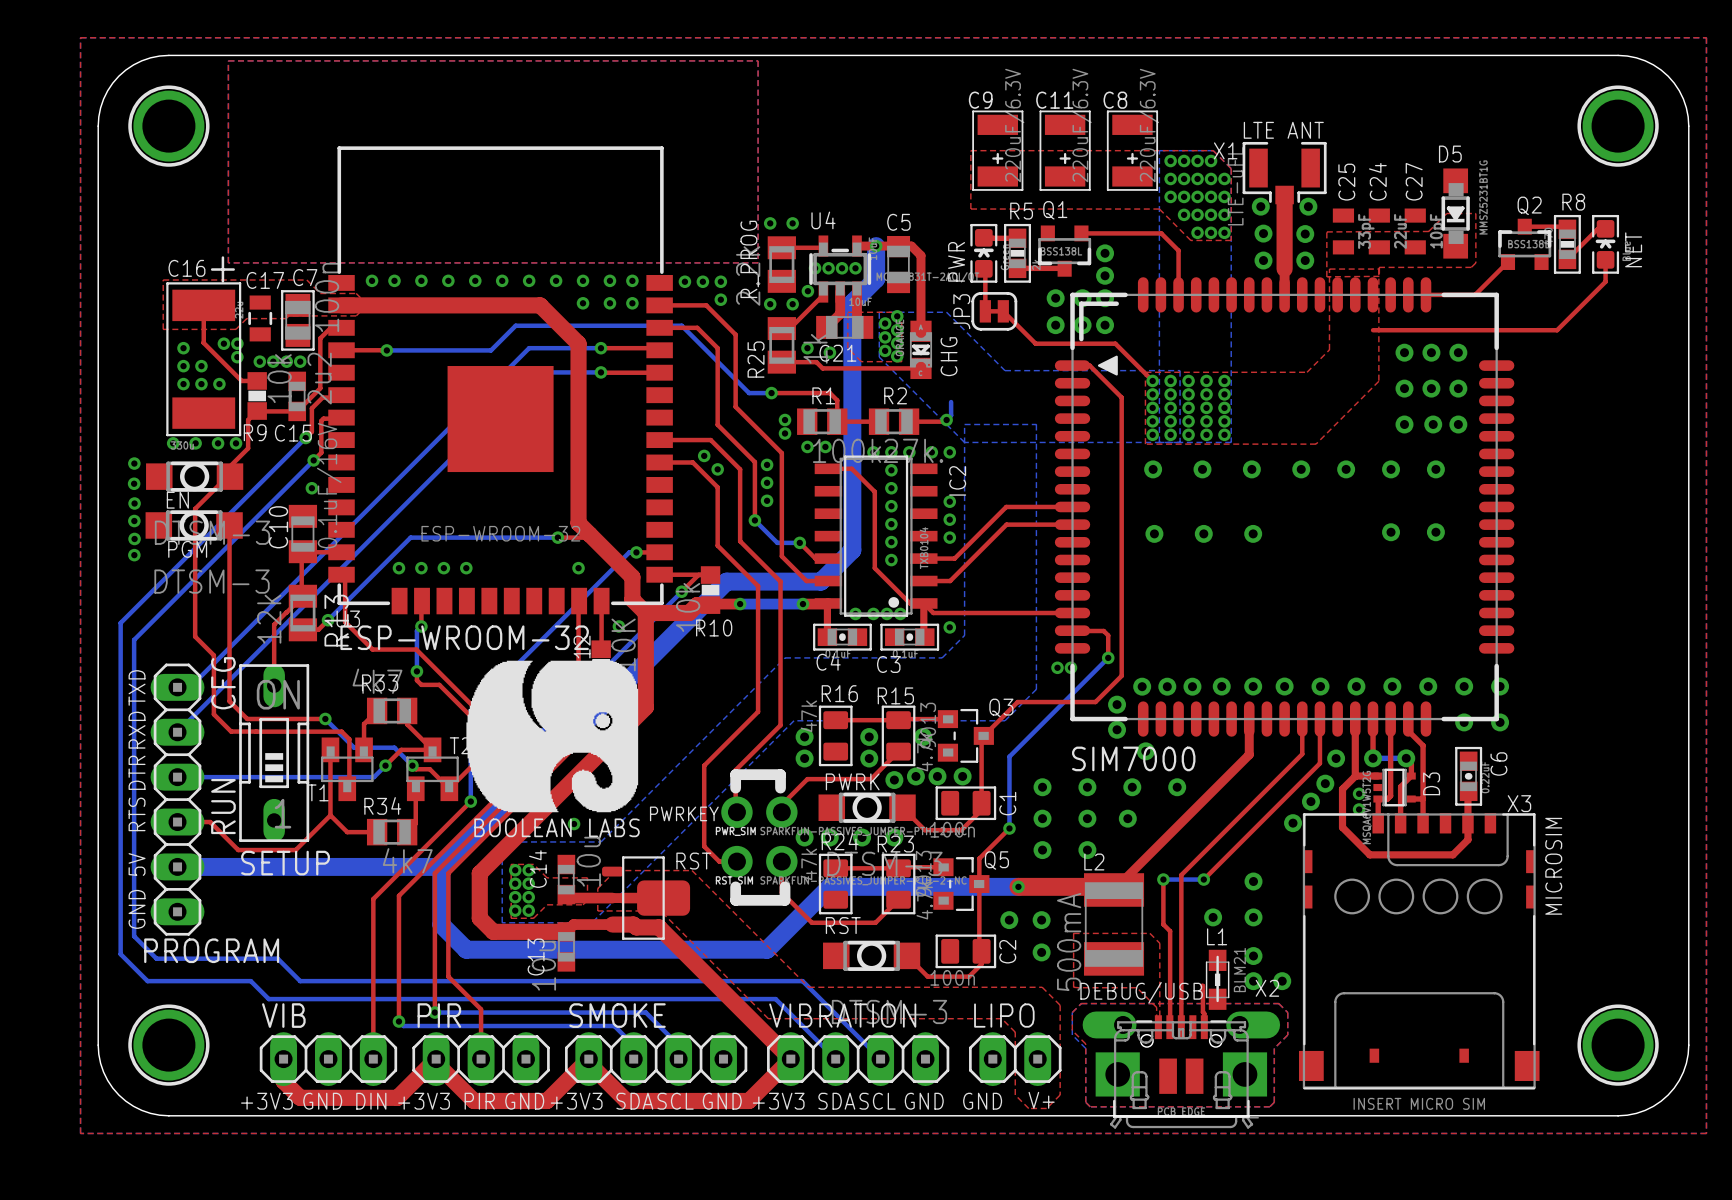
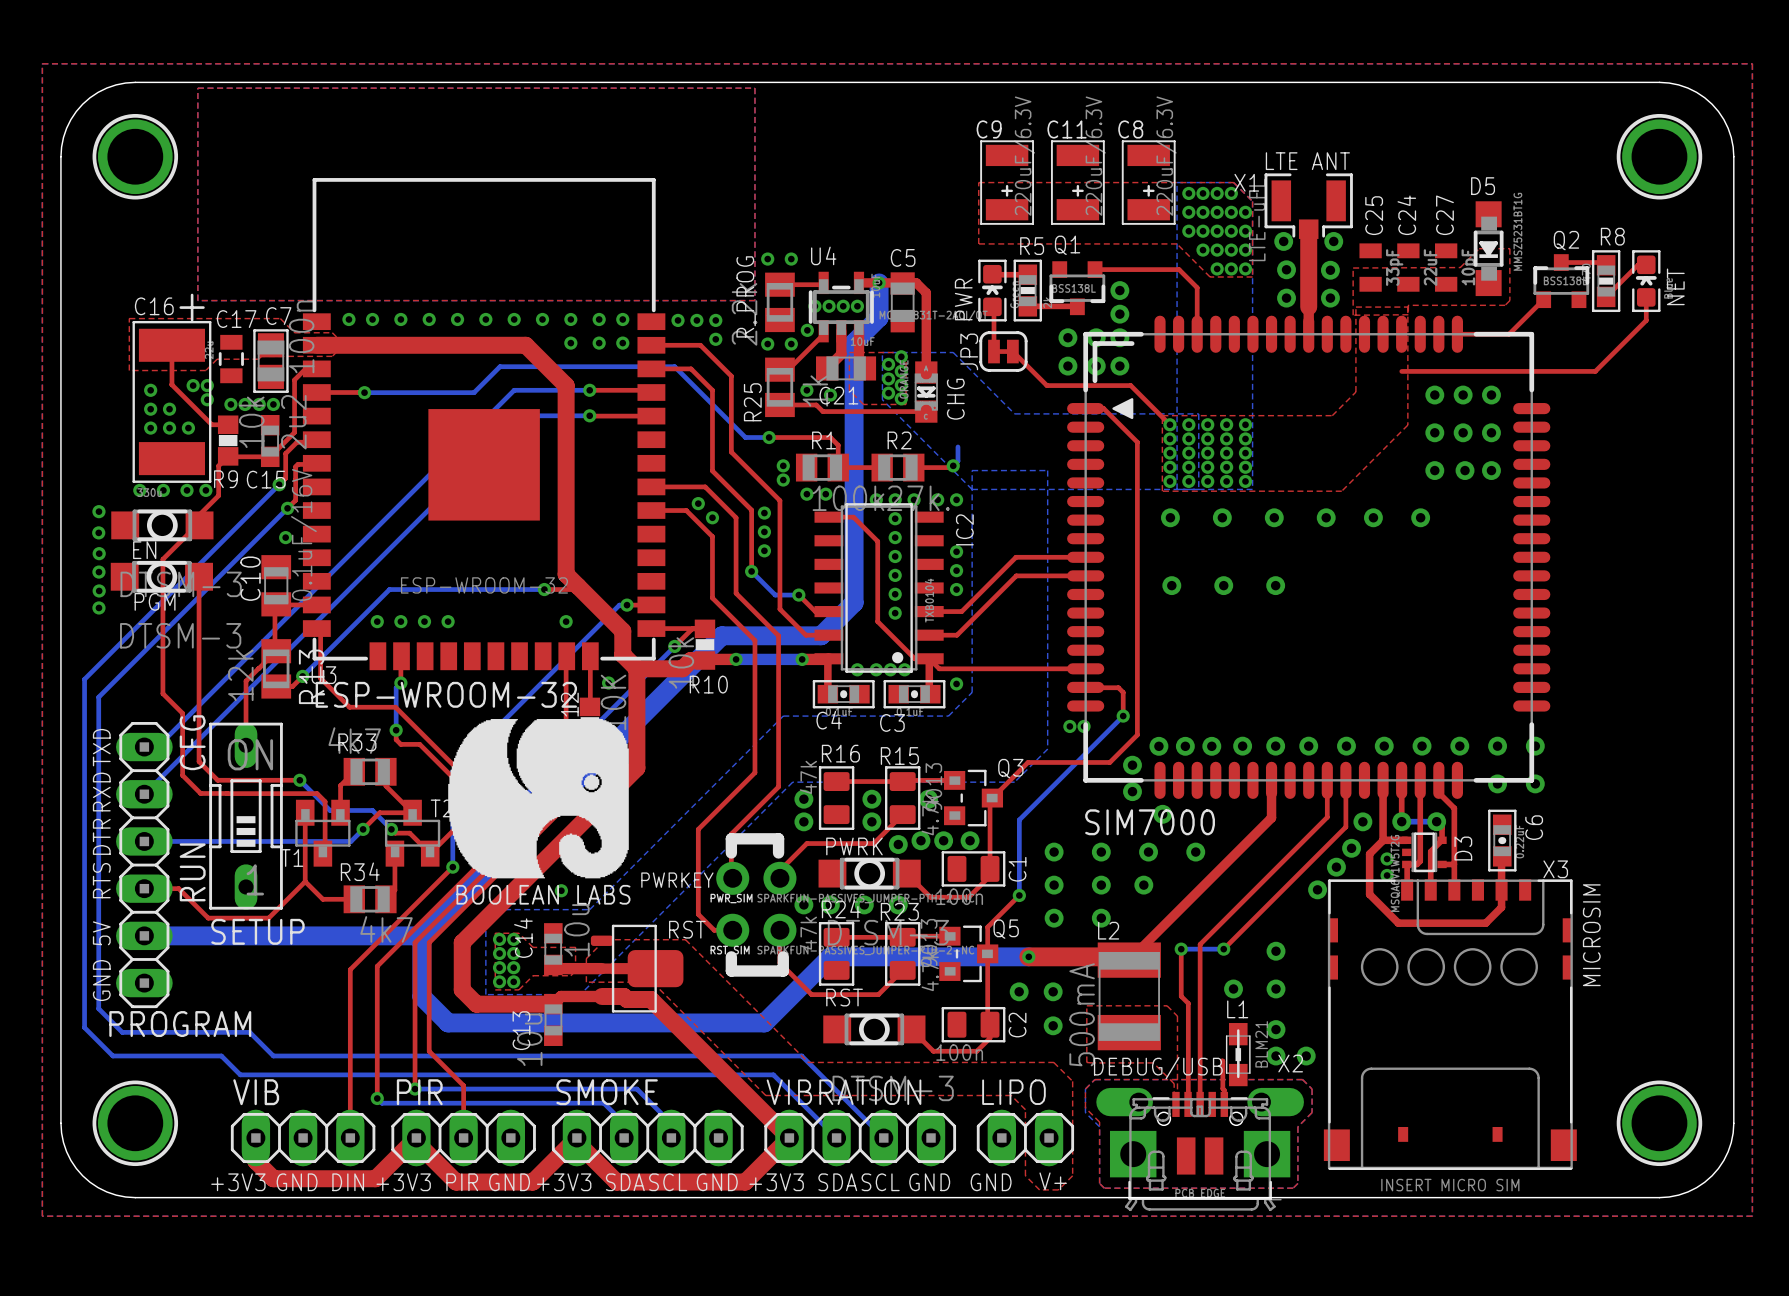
via: (1435, 469) -> none
via: (1391, 532) -> none
via: (1435, 532) -> none

